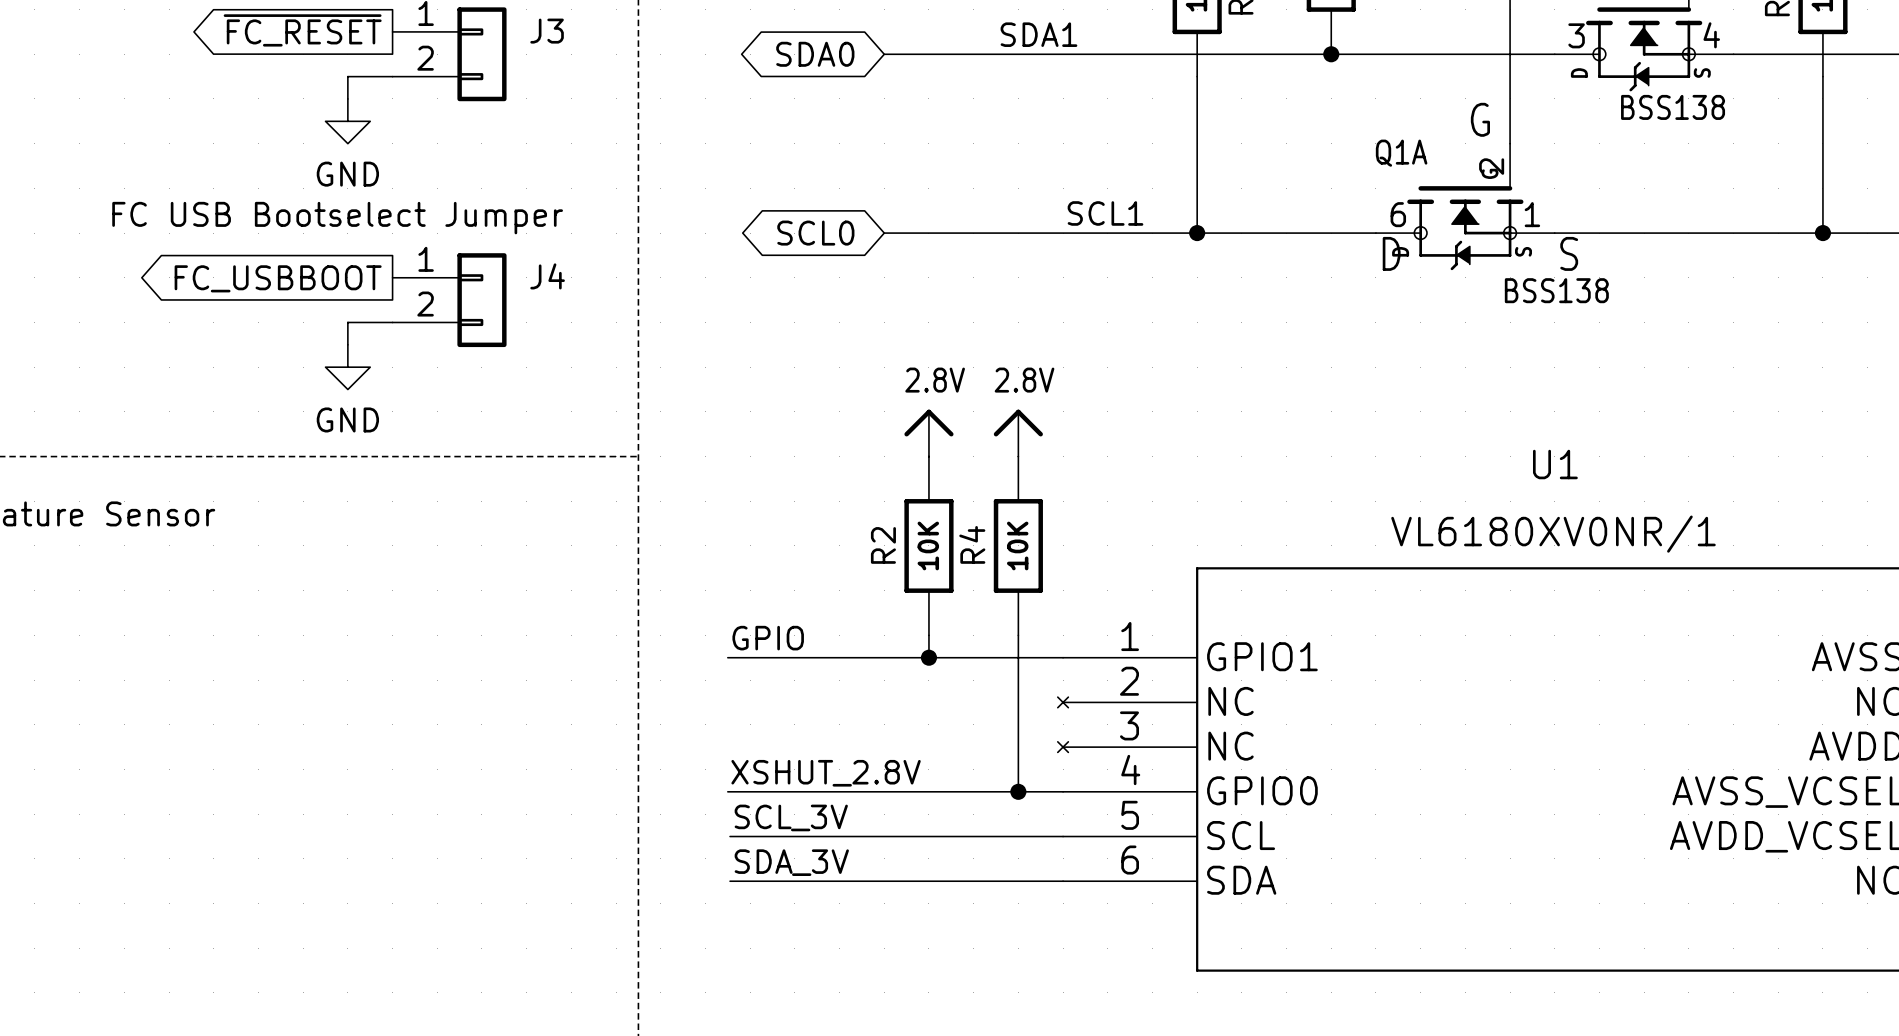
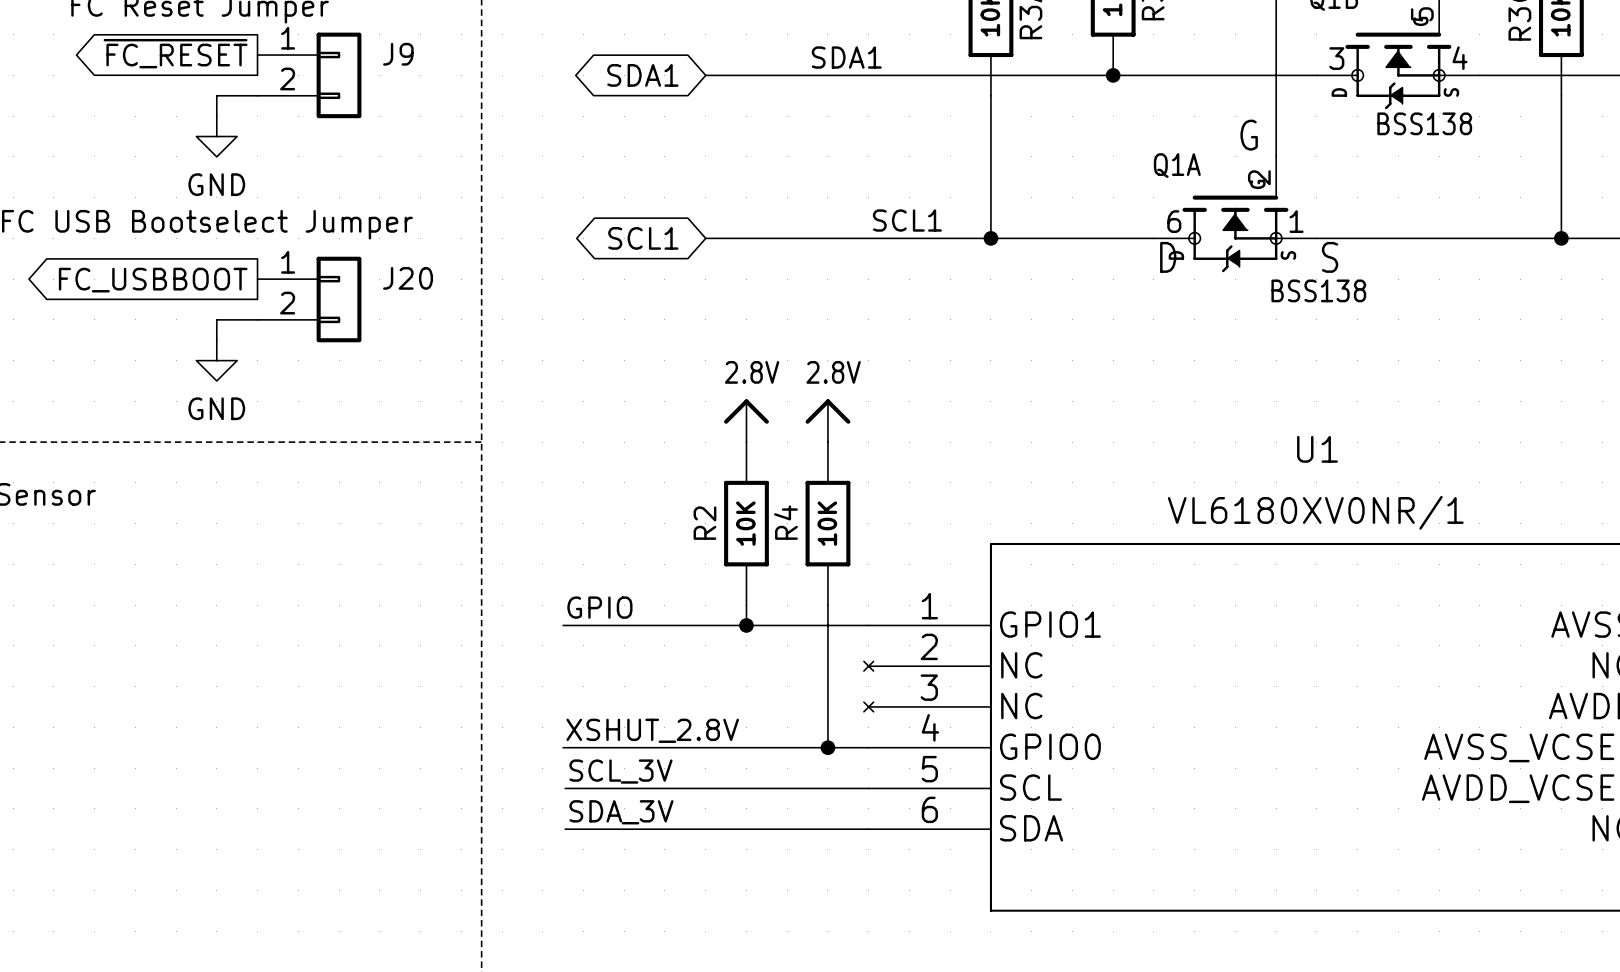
J3 name: J3 (547, 31) -> J9 (398, 54)
global label: SDA0 (815, 54) -> SDA1 (642, 75)
global label: SCL0 (815, 233) -> SCL1 (643, 238)
J4 name: J4 (547, 276) -> J20 (408, 278)

